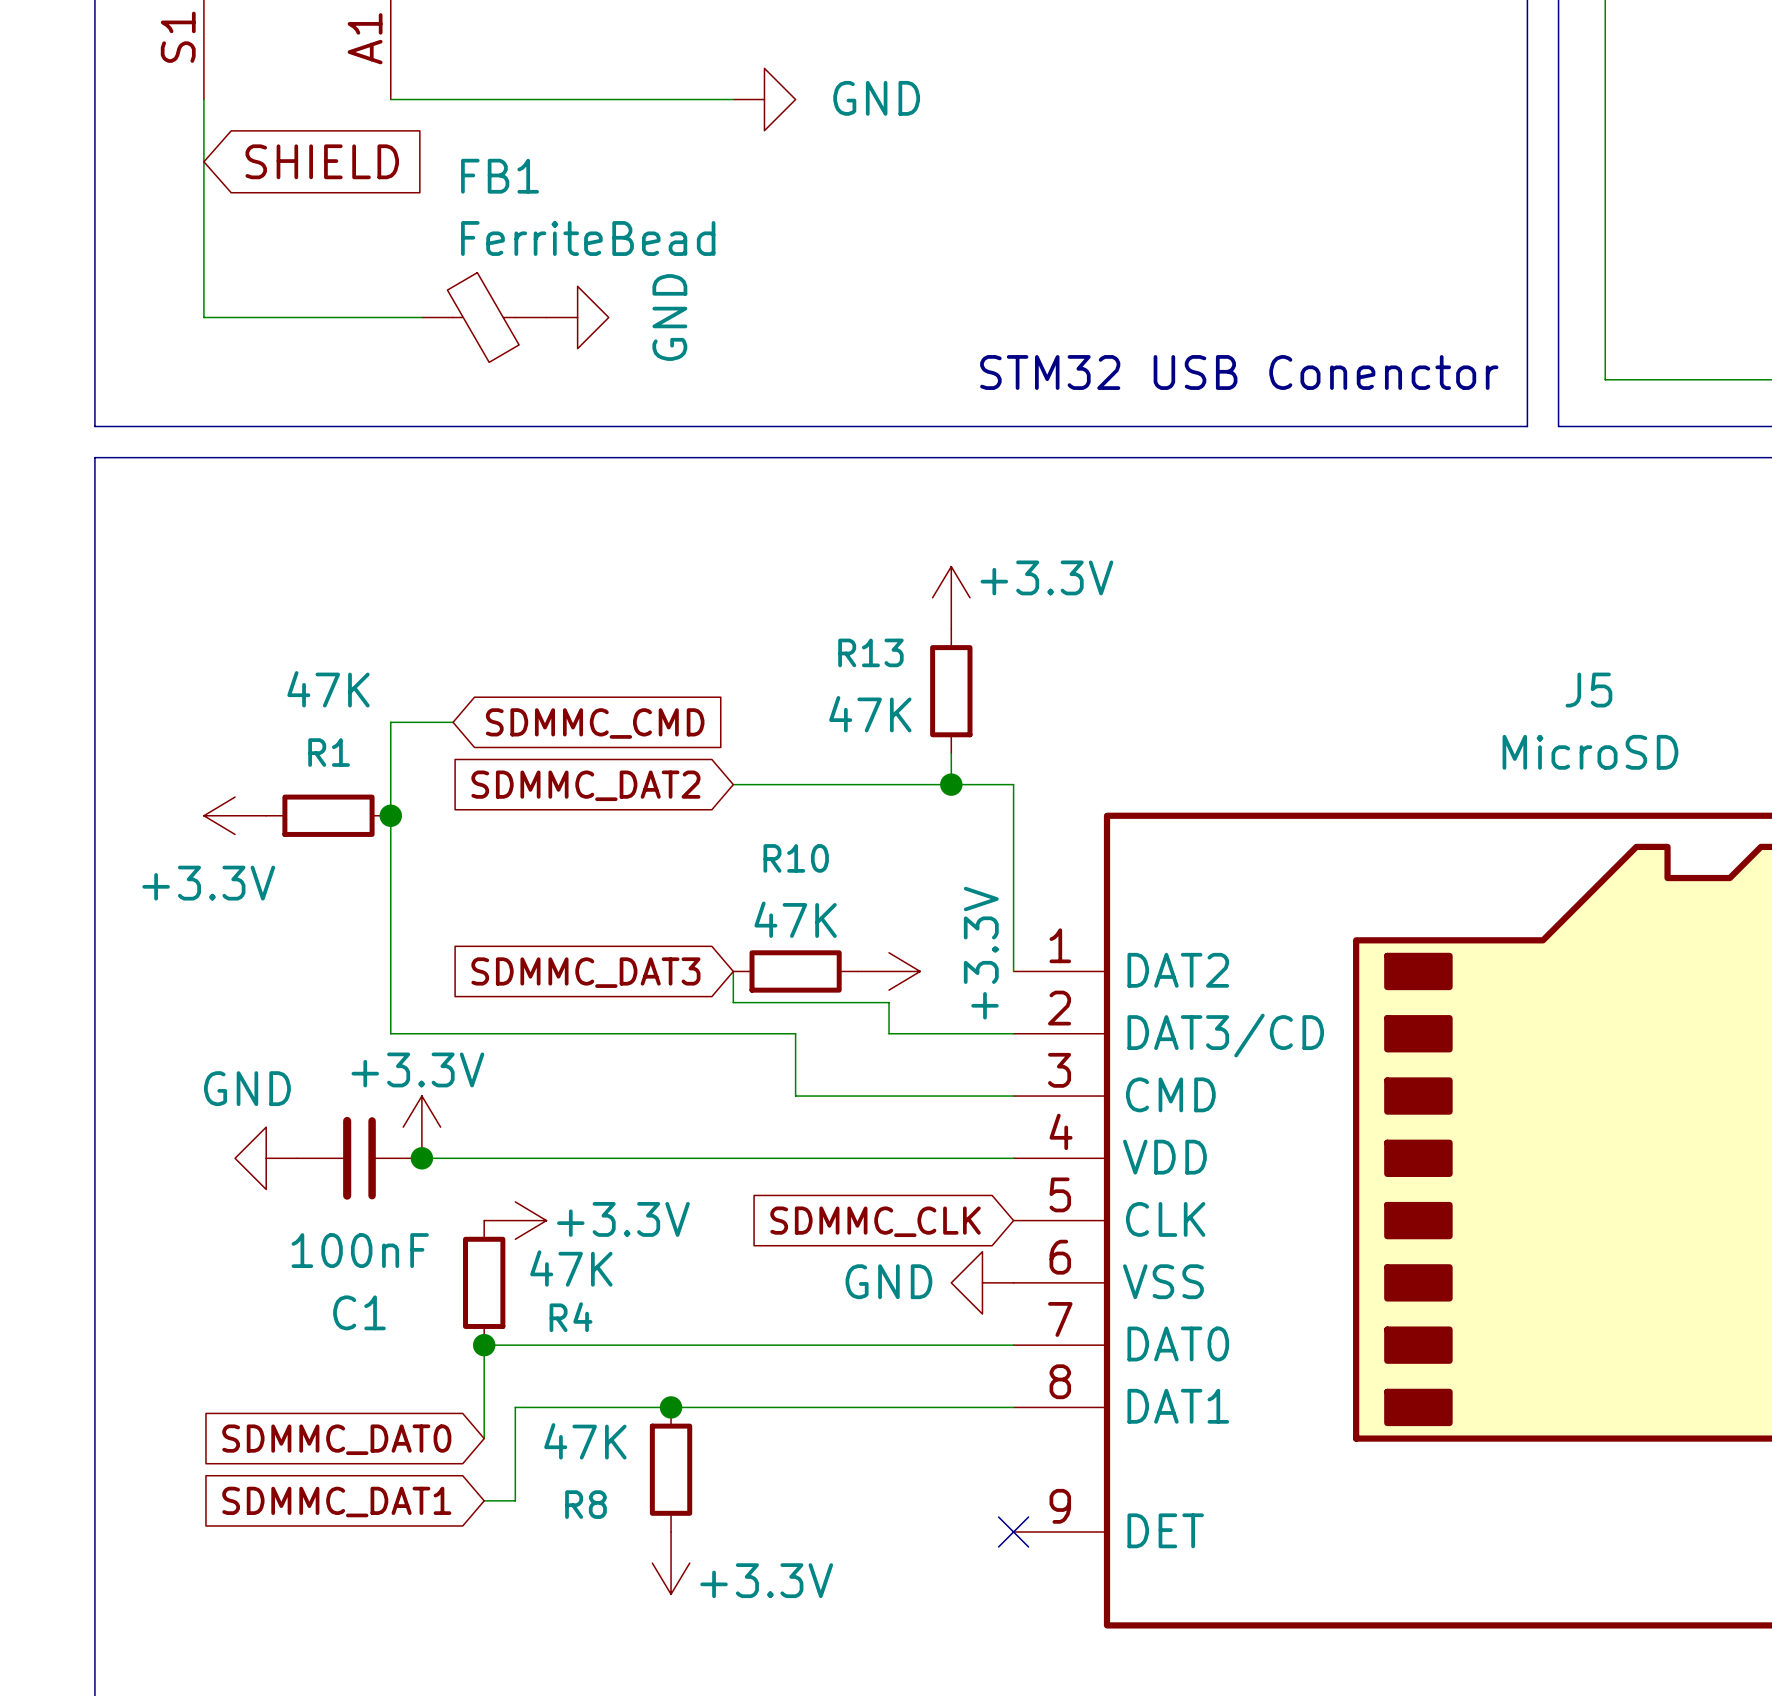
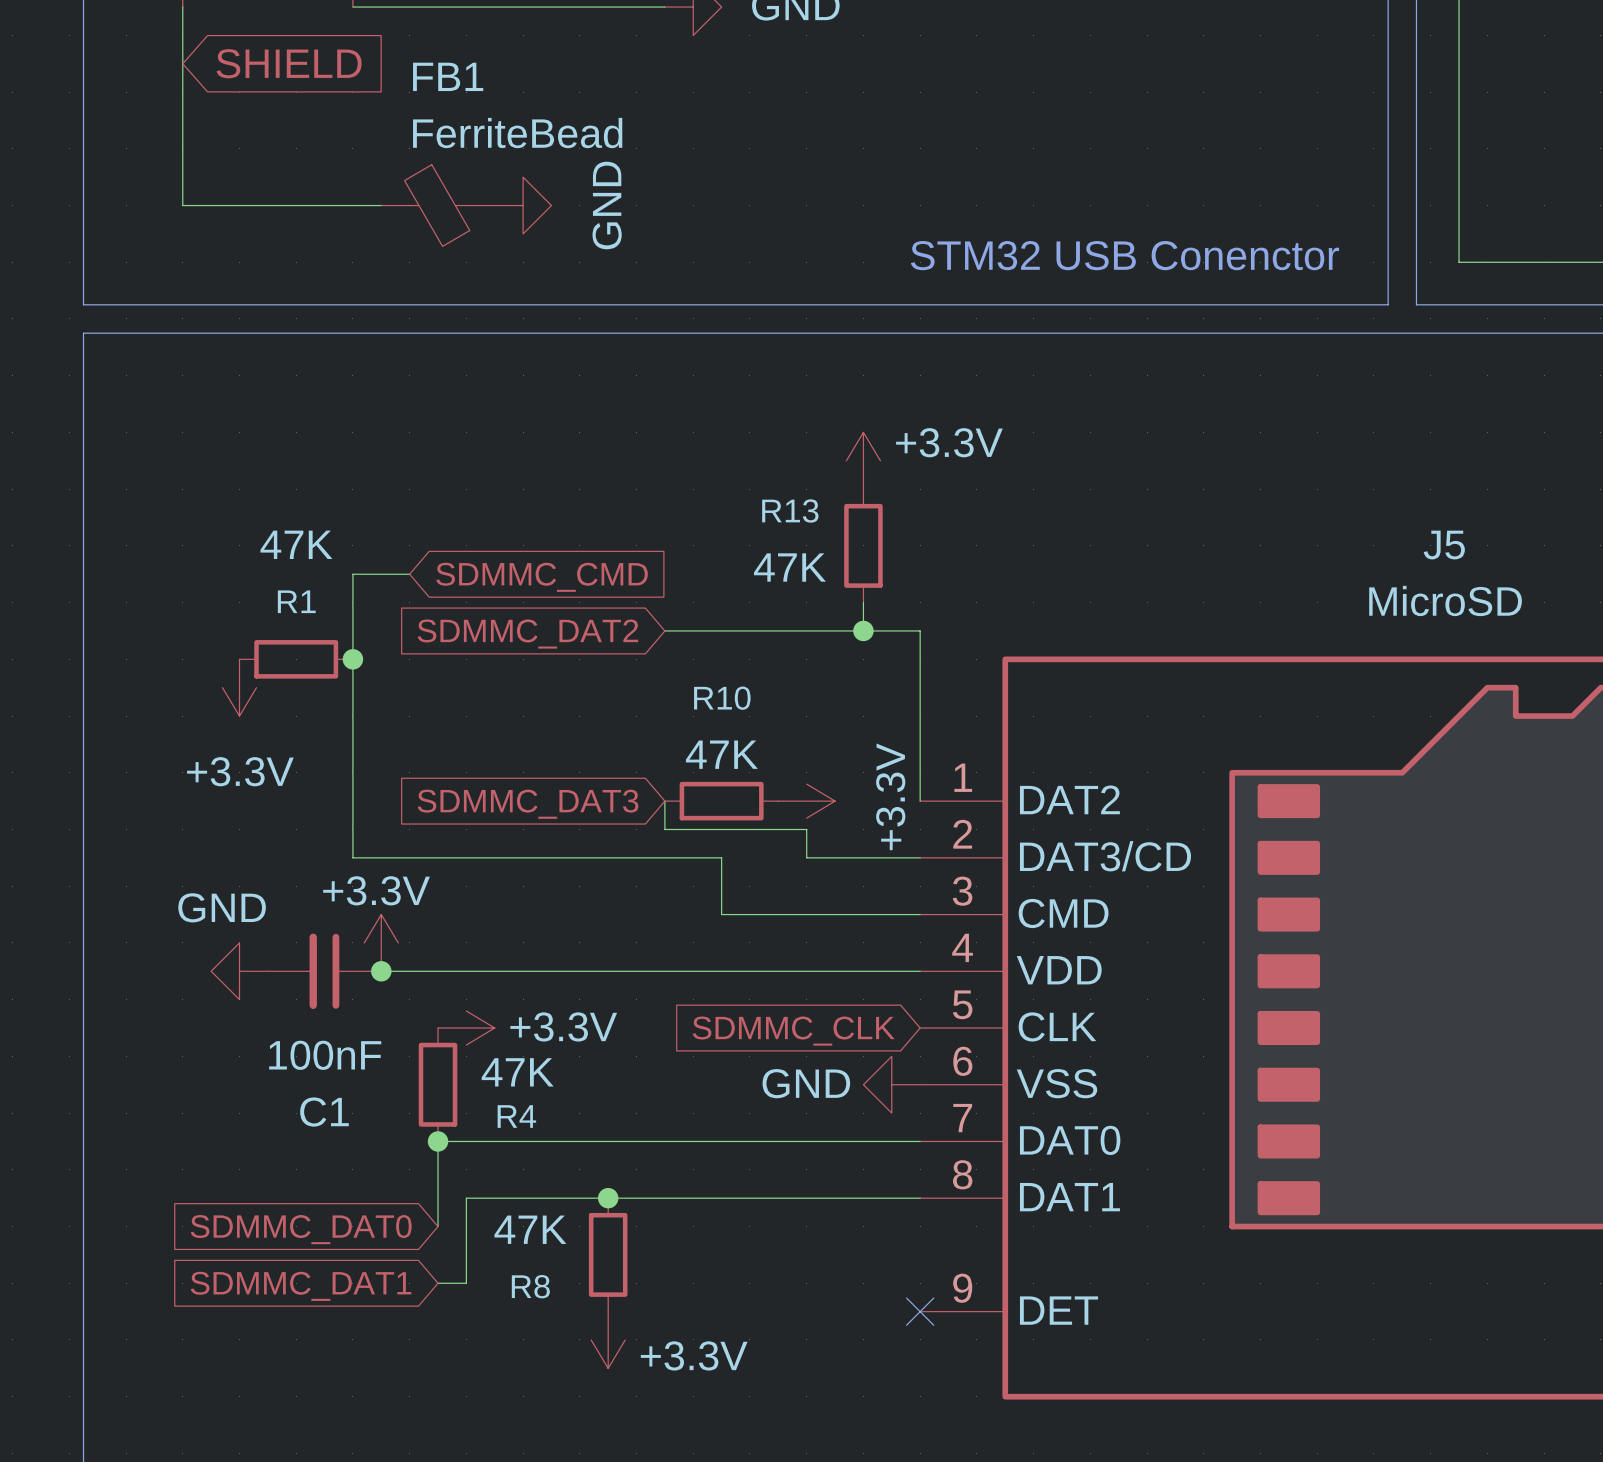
power symbol rotation: 0° (235, 815) -> 90° counterclockwise (239, 687)
power symbol position: +3.3V (235, 815) -> +3.3V (239, 687)
power symbol text position: +3.3V (208, 883) -> +3.3V (240, 771)

